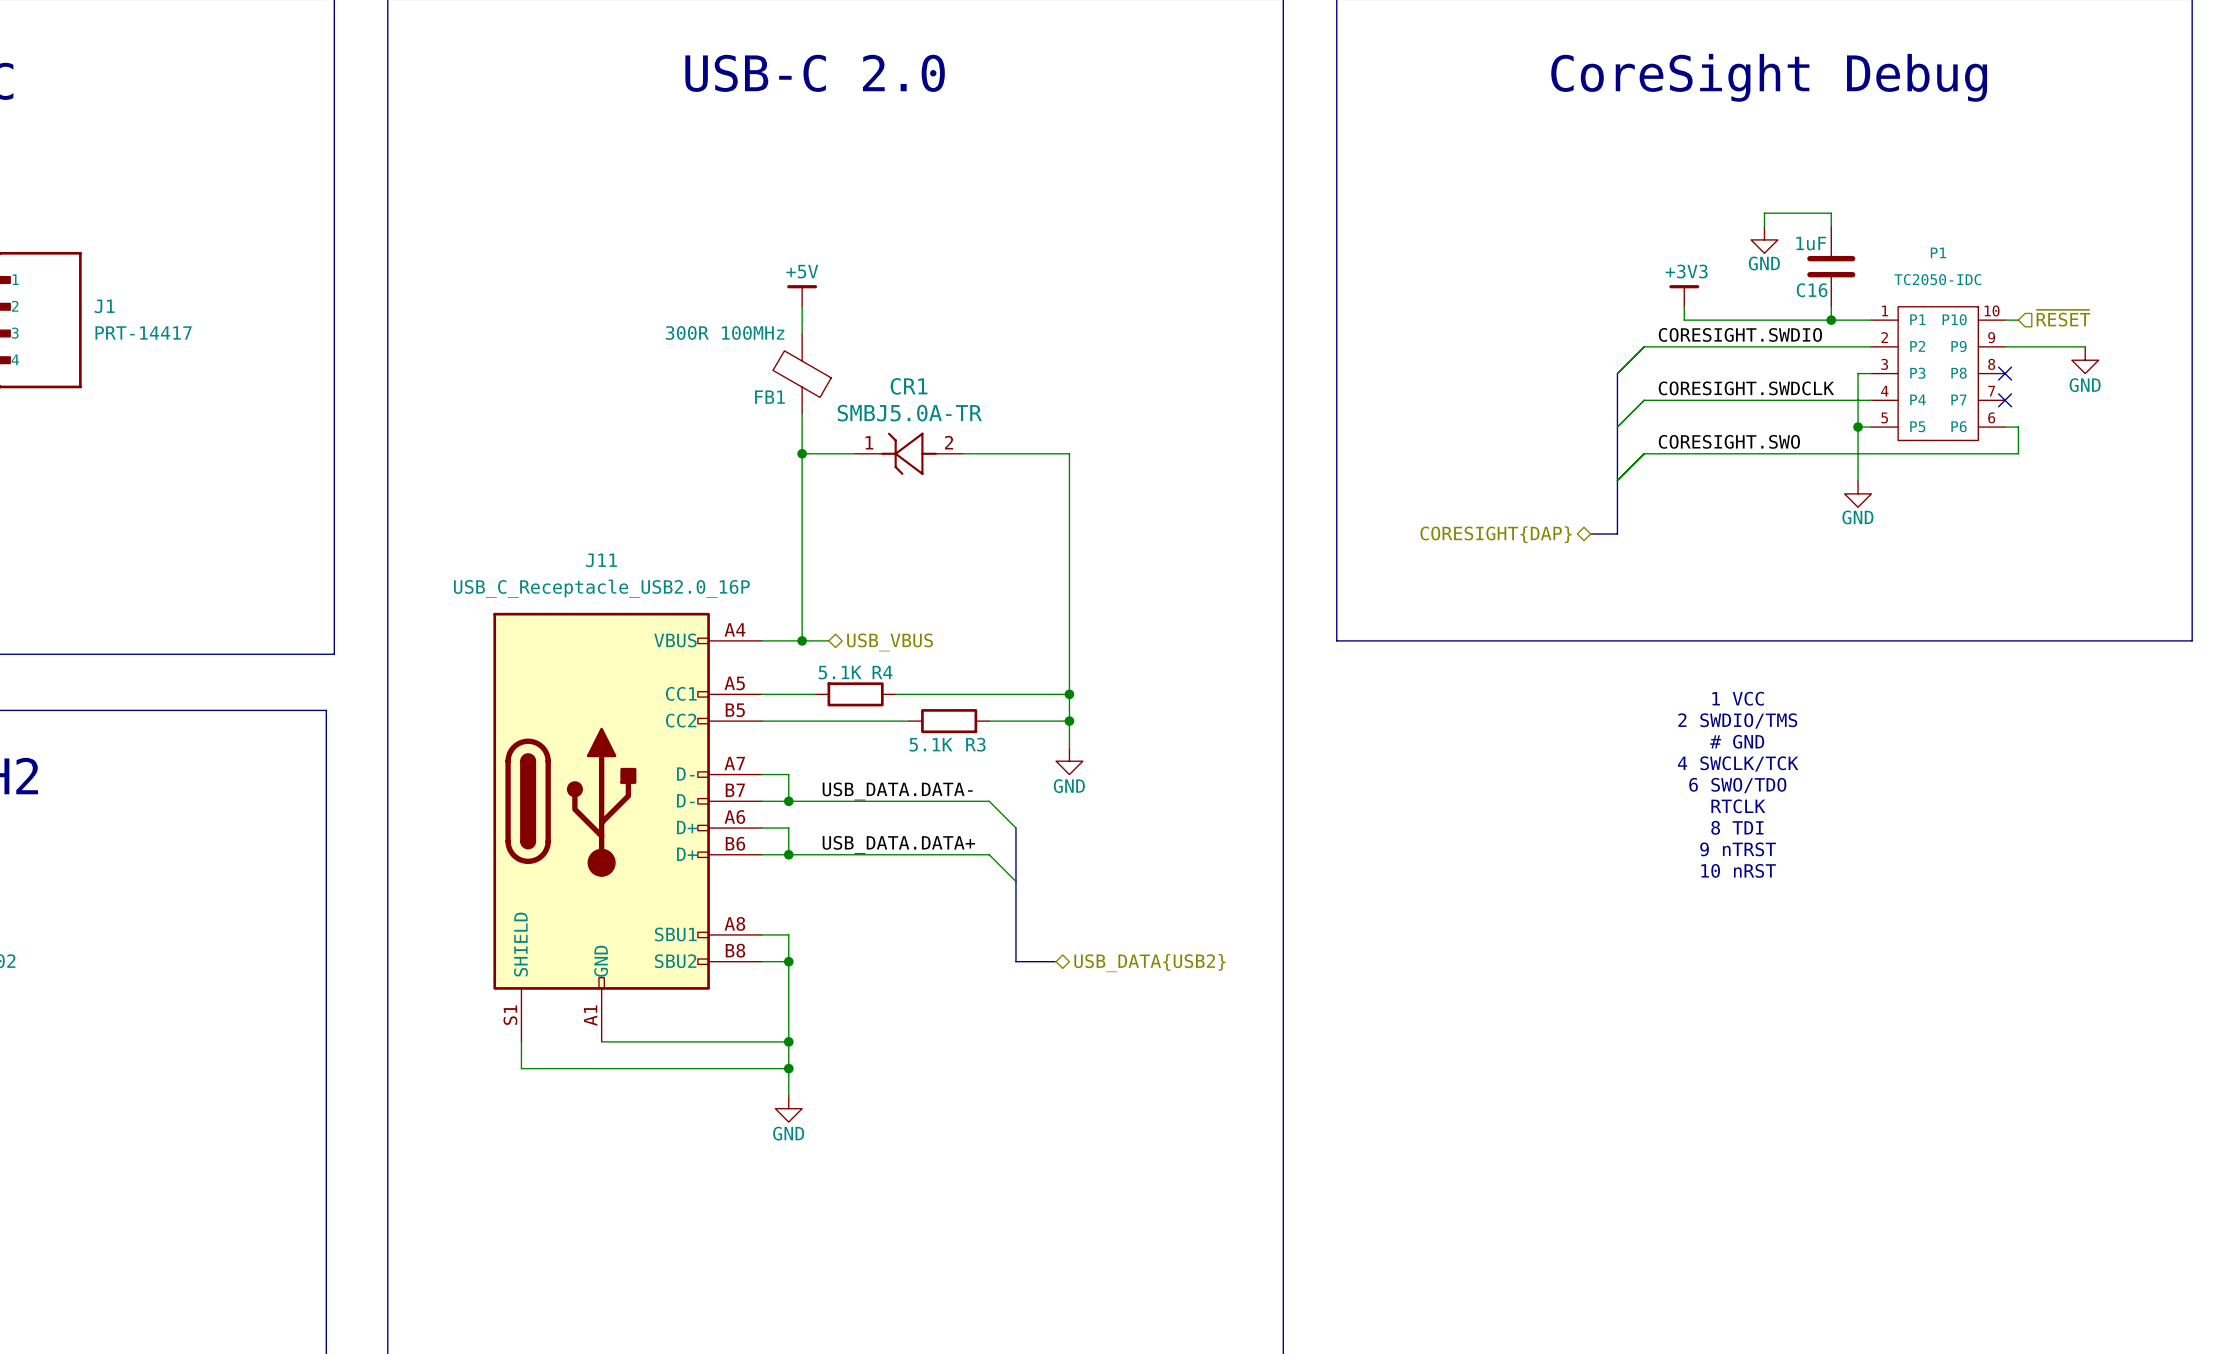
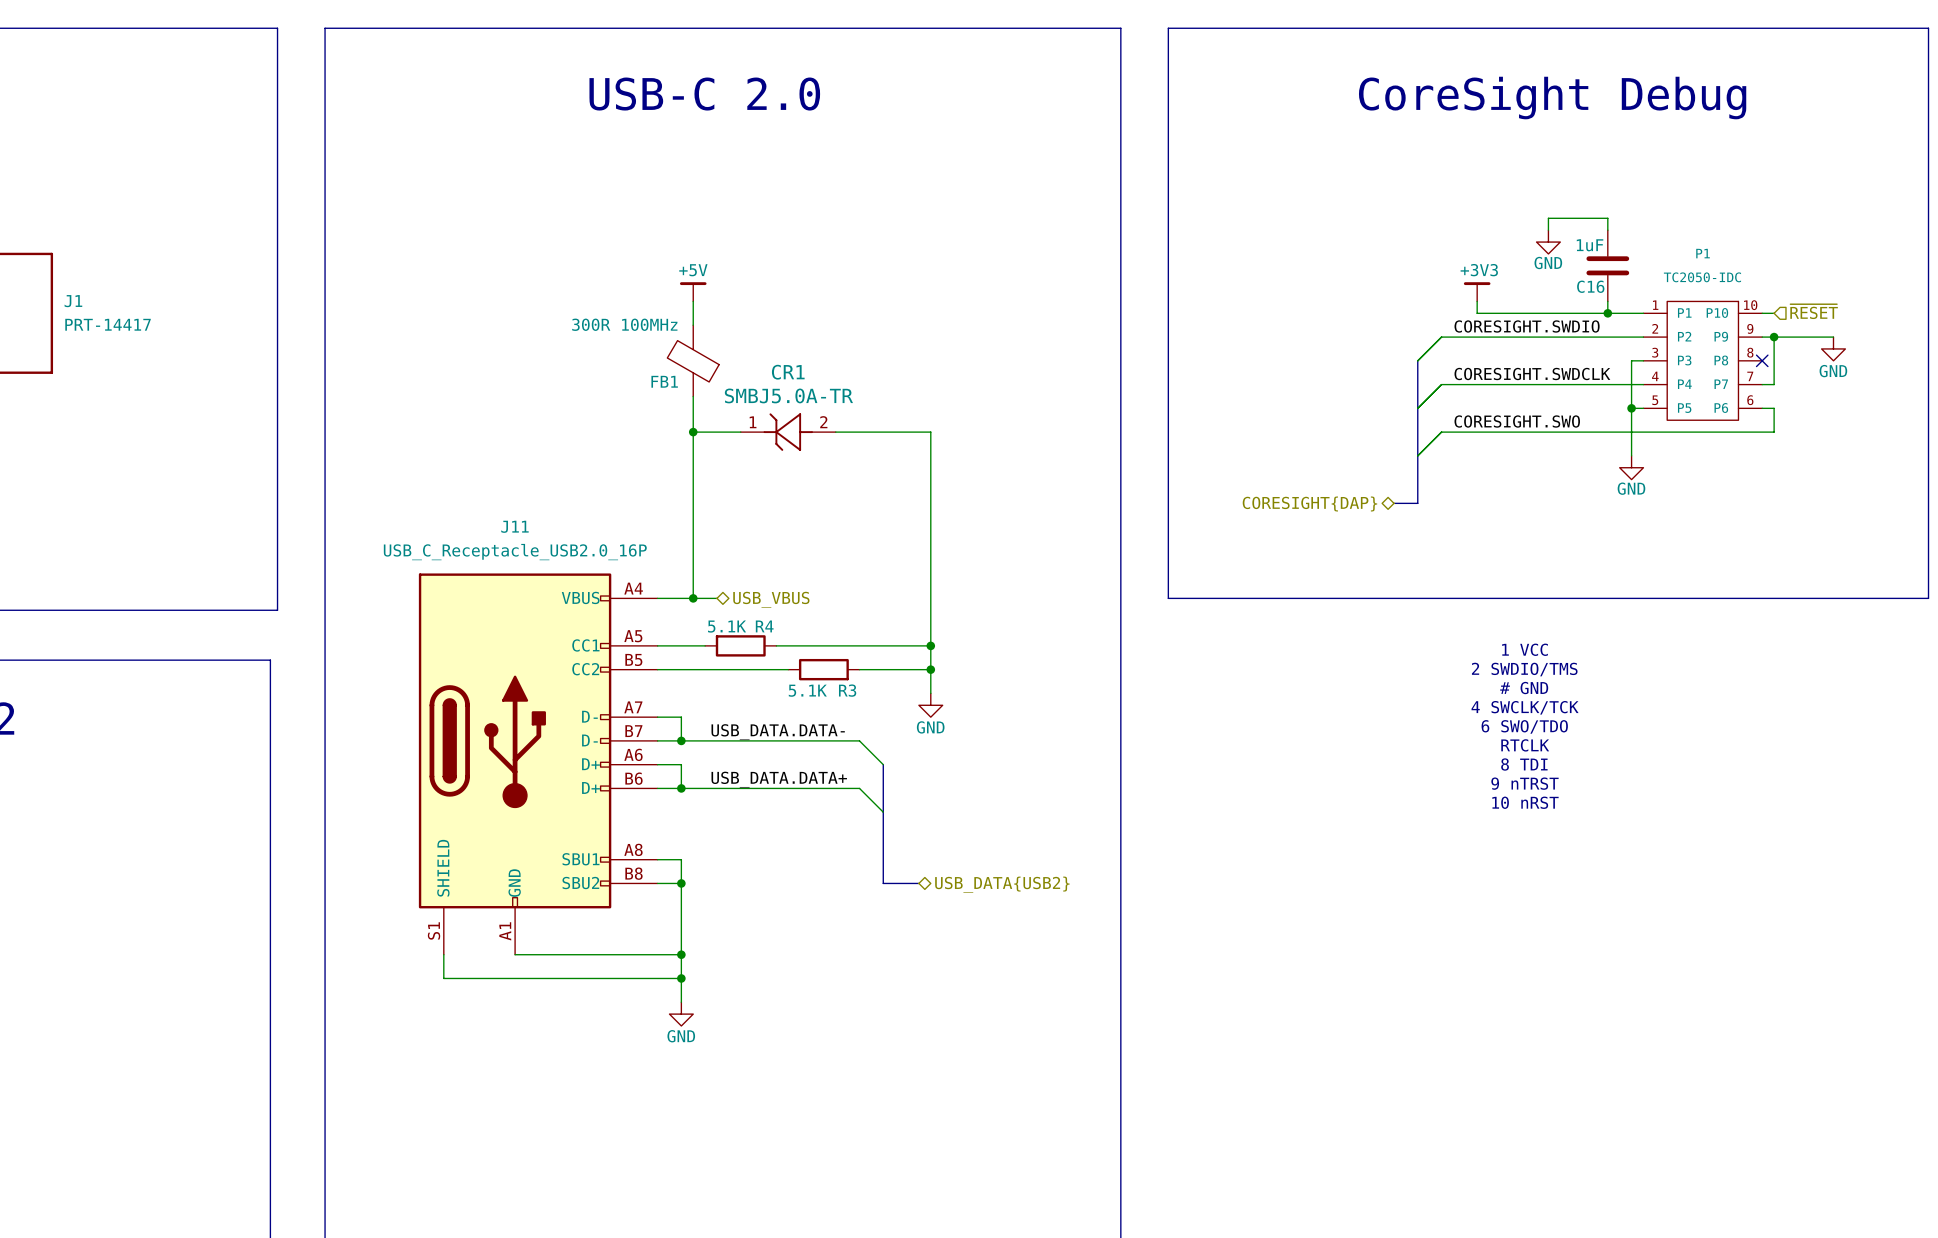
wire: none -> (1774, 337) (1774, 384) (1762, 384)
junction: none -> (1774, 337)
no-connect mark: (2005, 400) -> none

